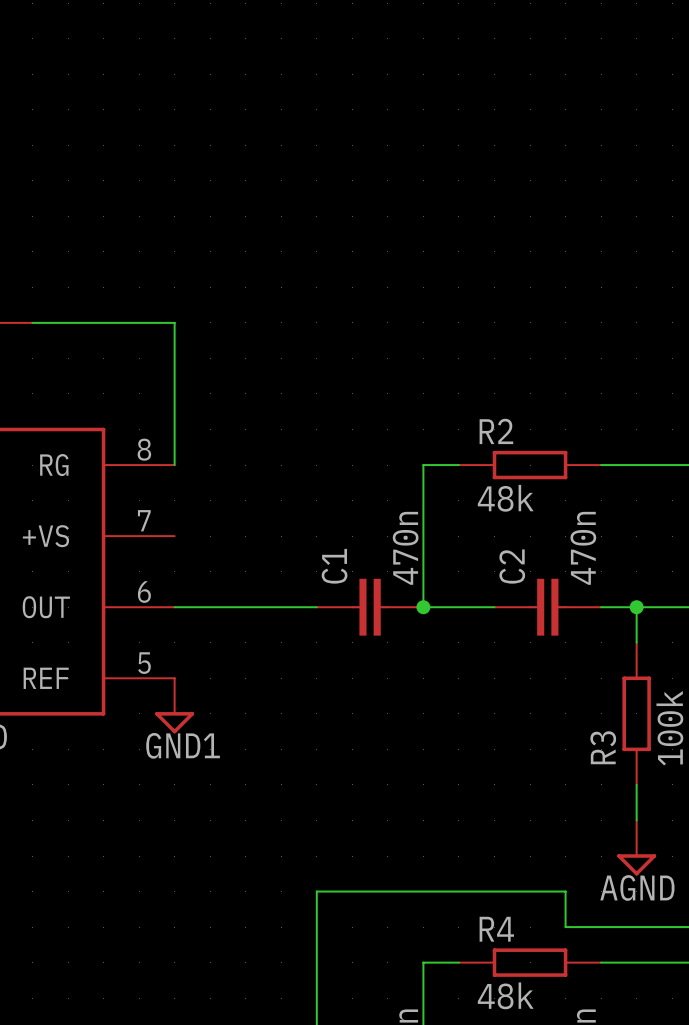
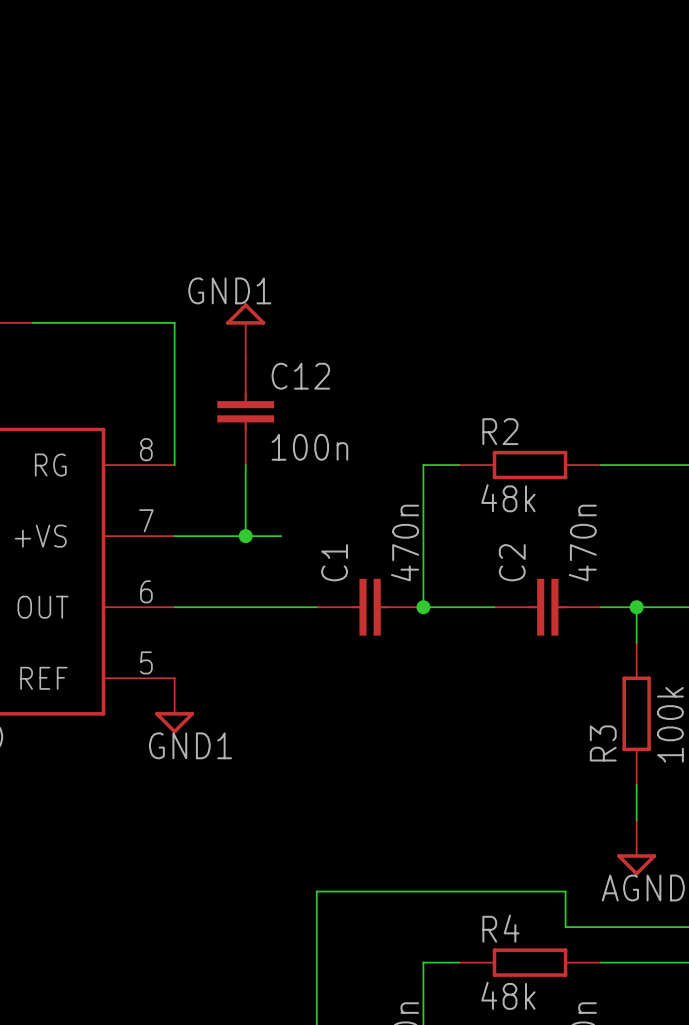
power symbol: none -> GND1 (245, 330)
C12: none -> 100n (245, 411)
wire: none -> (245, 465) (245, 536)
wire: none -> (174, 536) (281, 536)
junction: none -> (245, 536)

